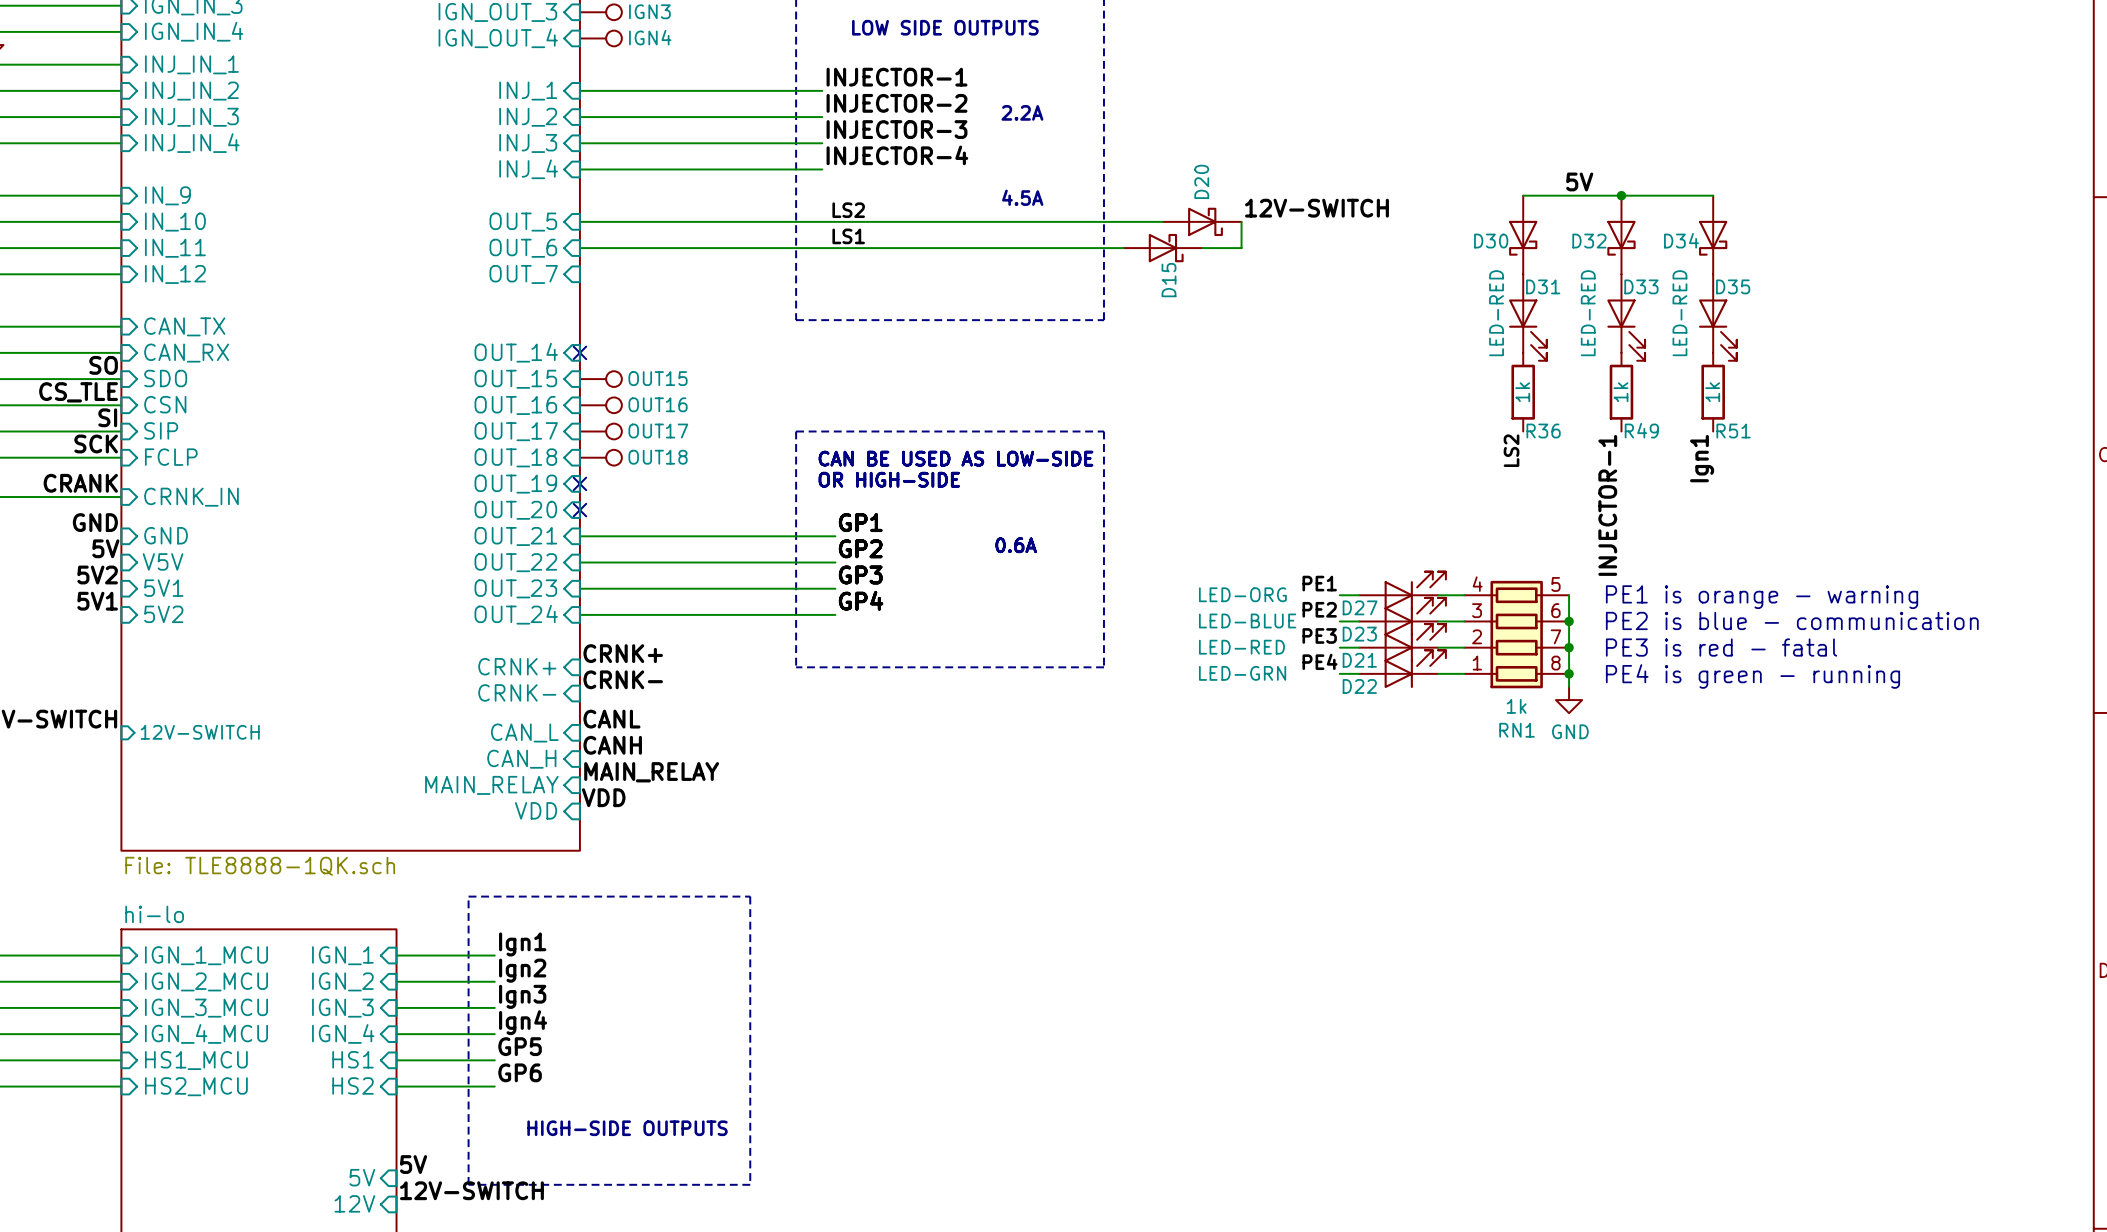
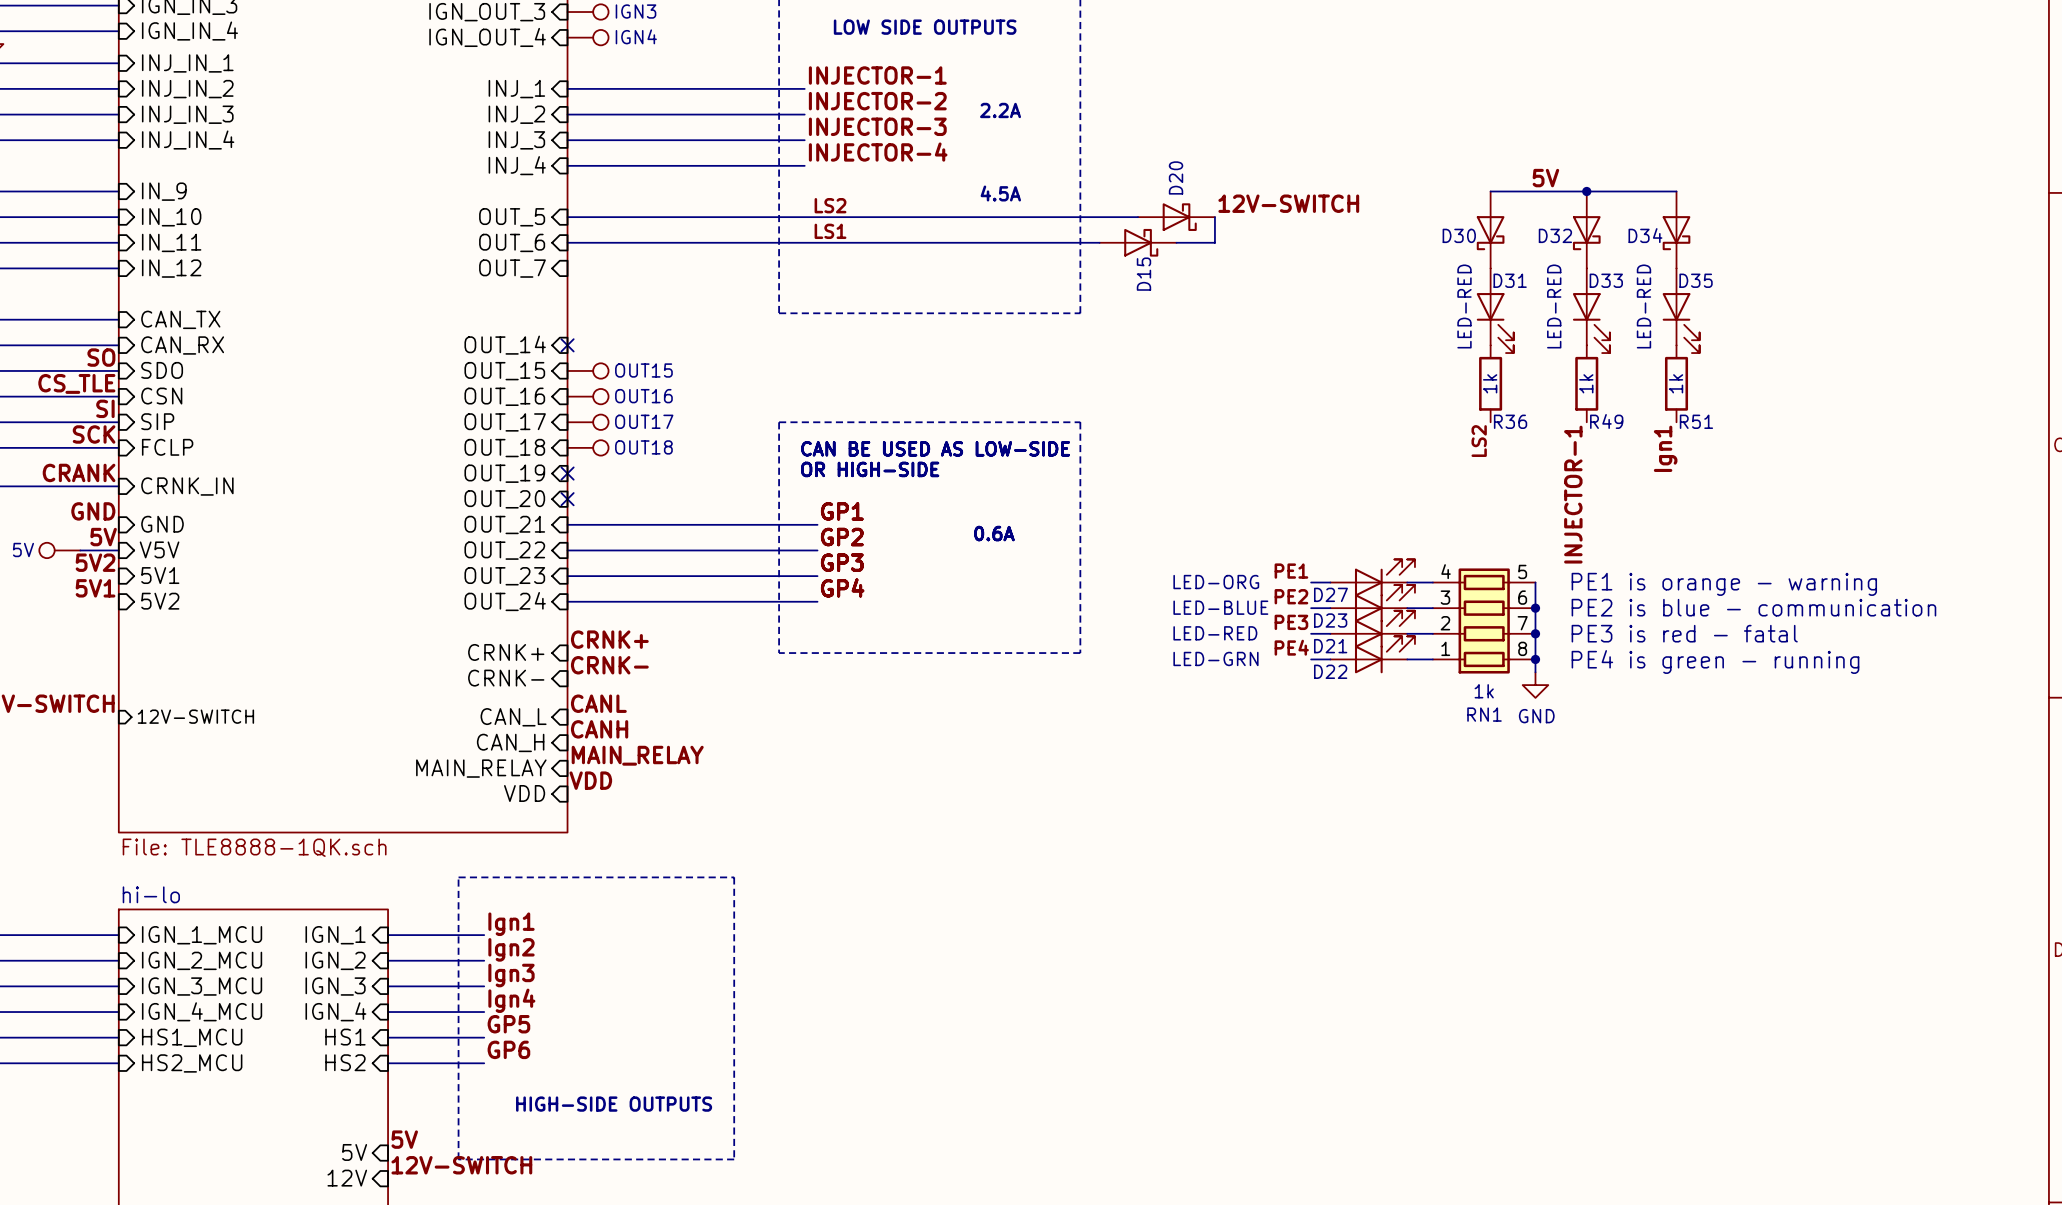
part: none -> 5V (59, 550)
wire: none -> (80, 550) (118, 550)

